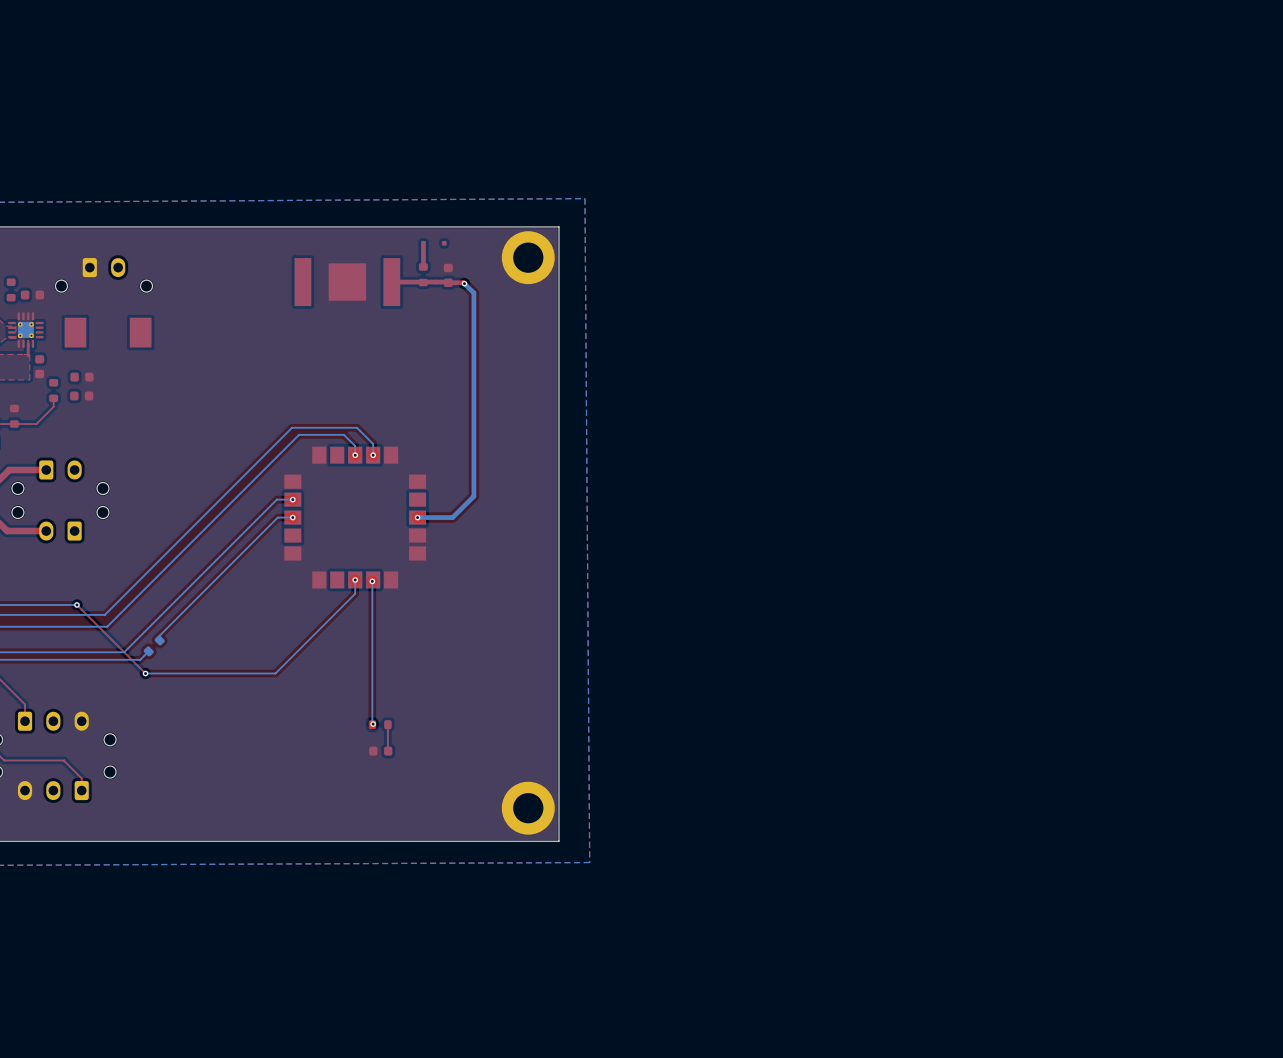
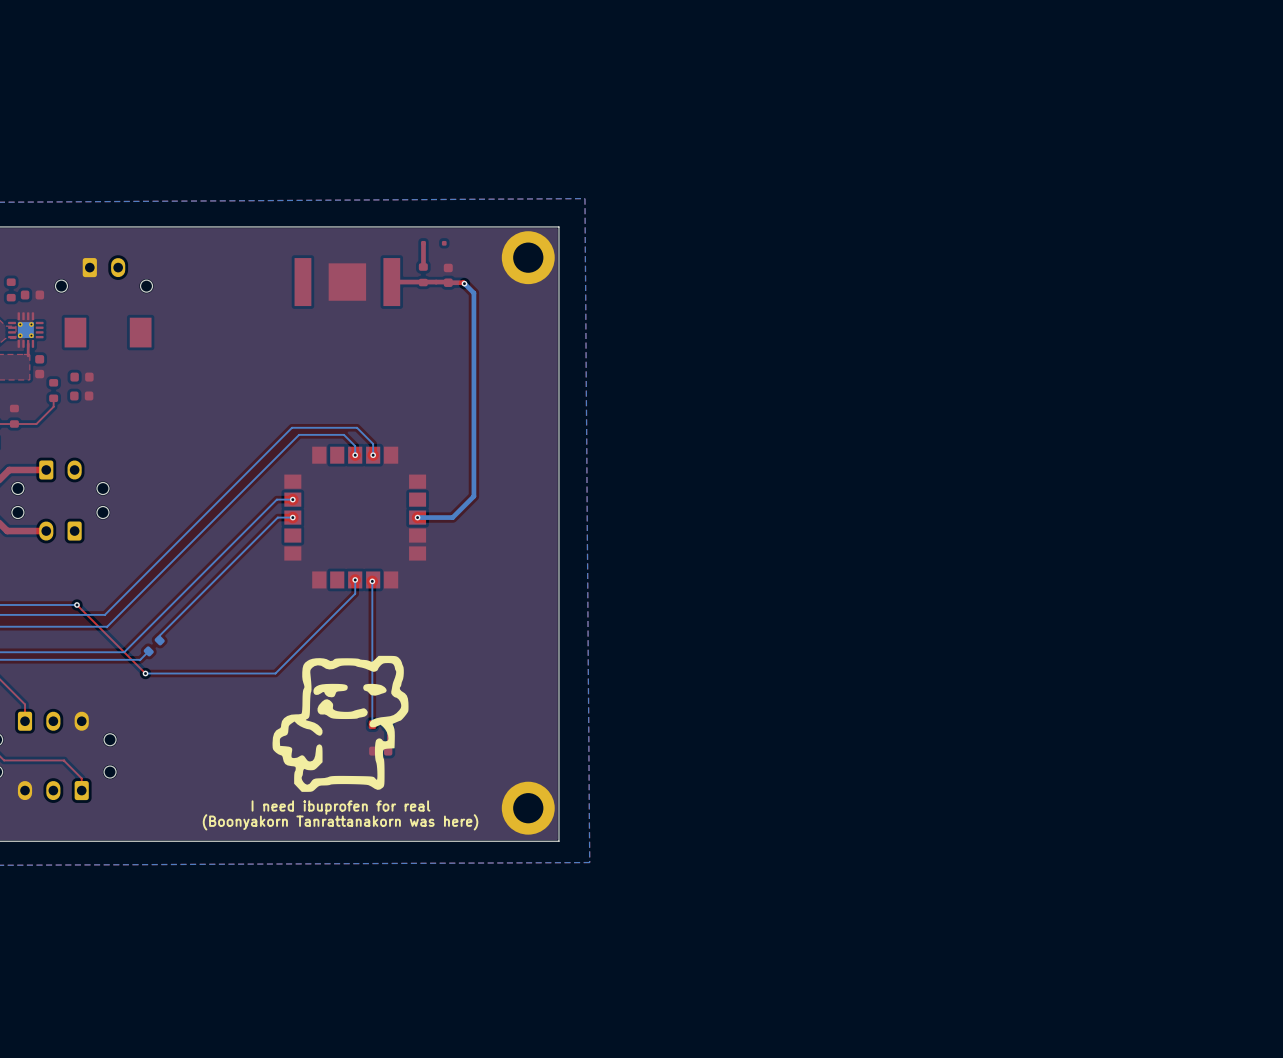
drawing: none -> [272, 655, 409, 792]
text: none -> I need ibuprofen for real (340, 807)
text: none -> (Boonyakorn Tanrattanakorn was here) (340, 822)

